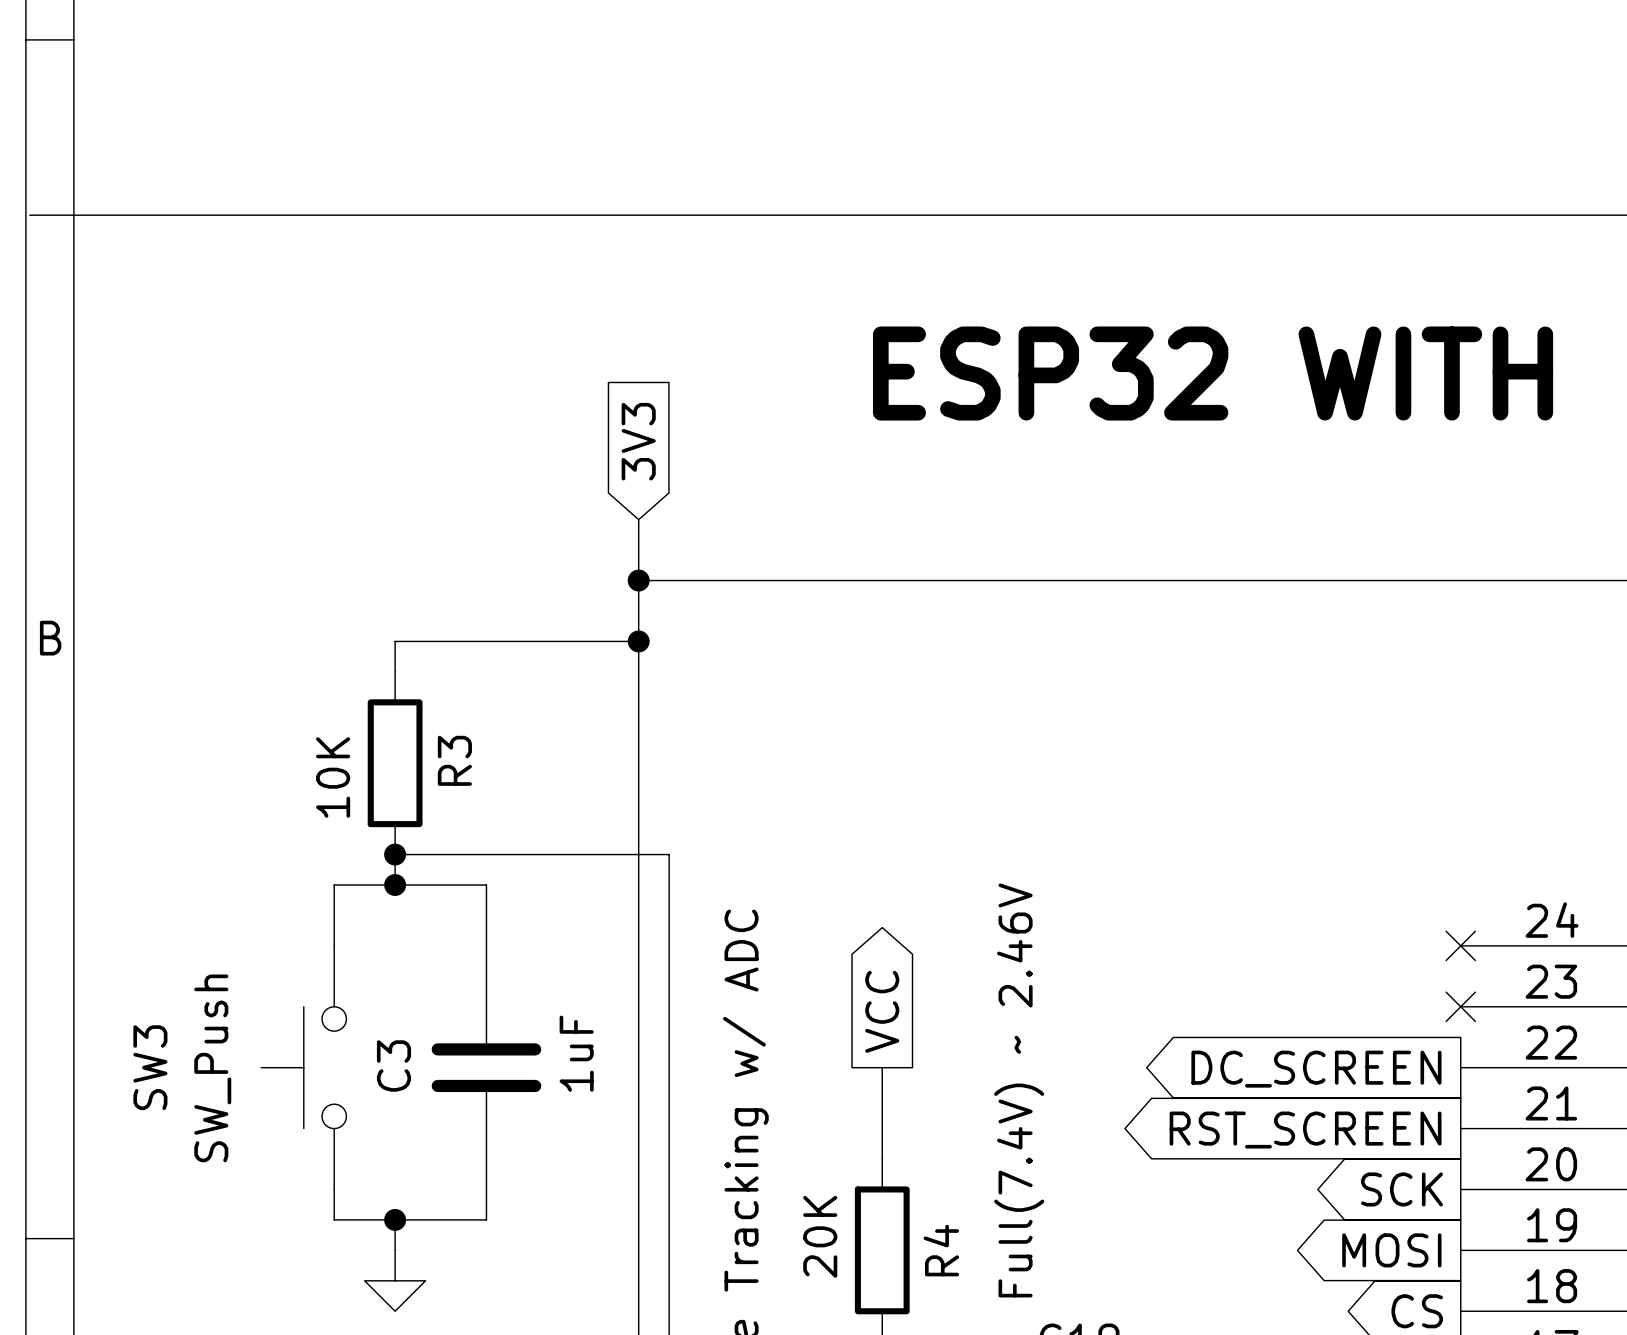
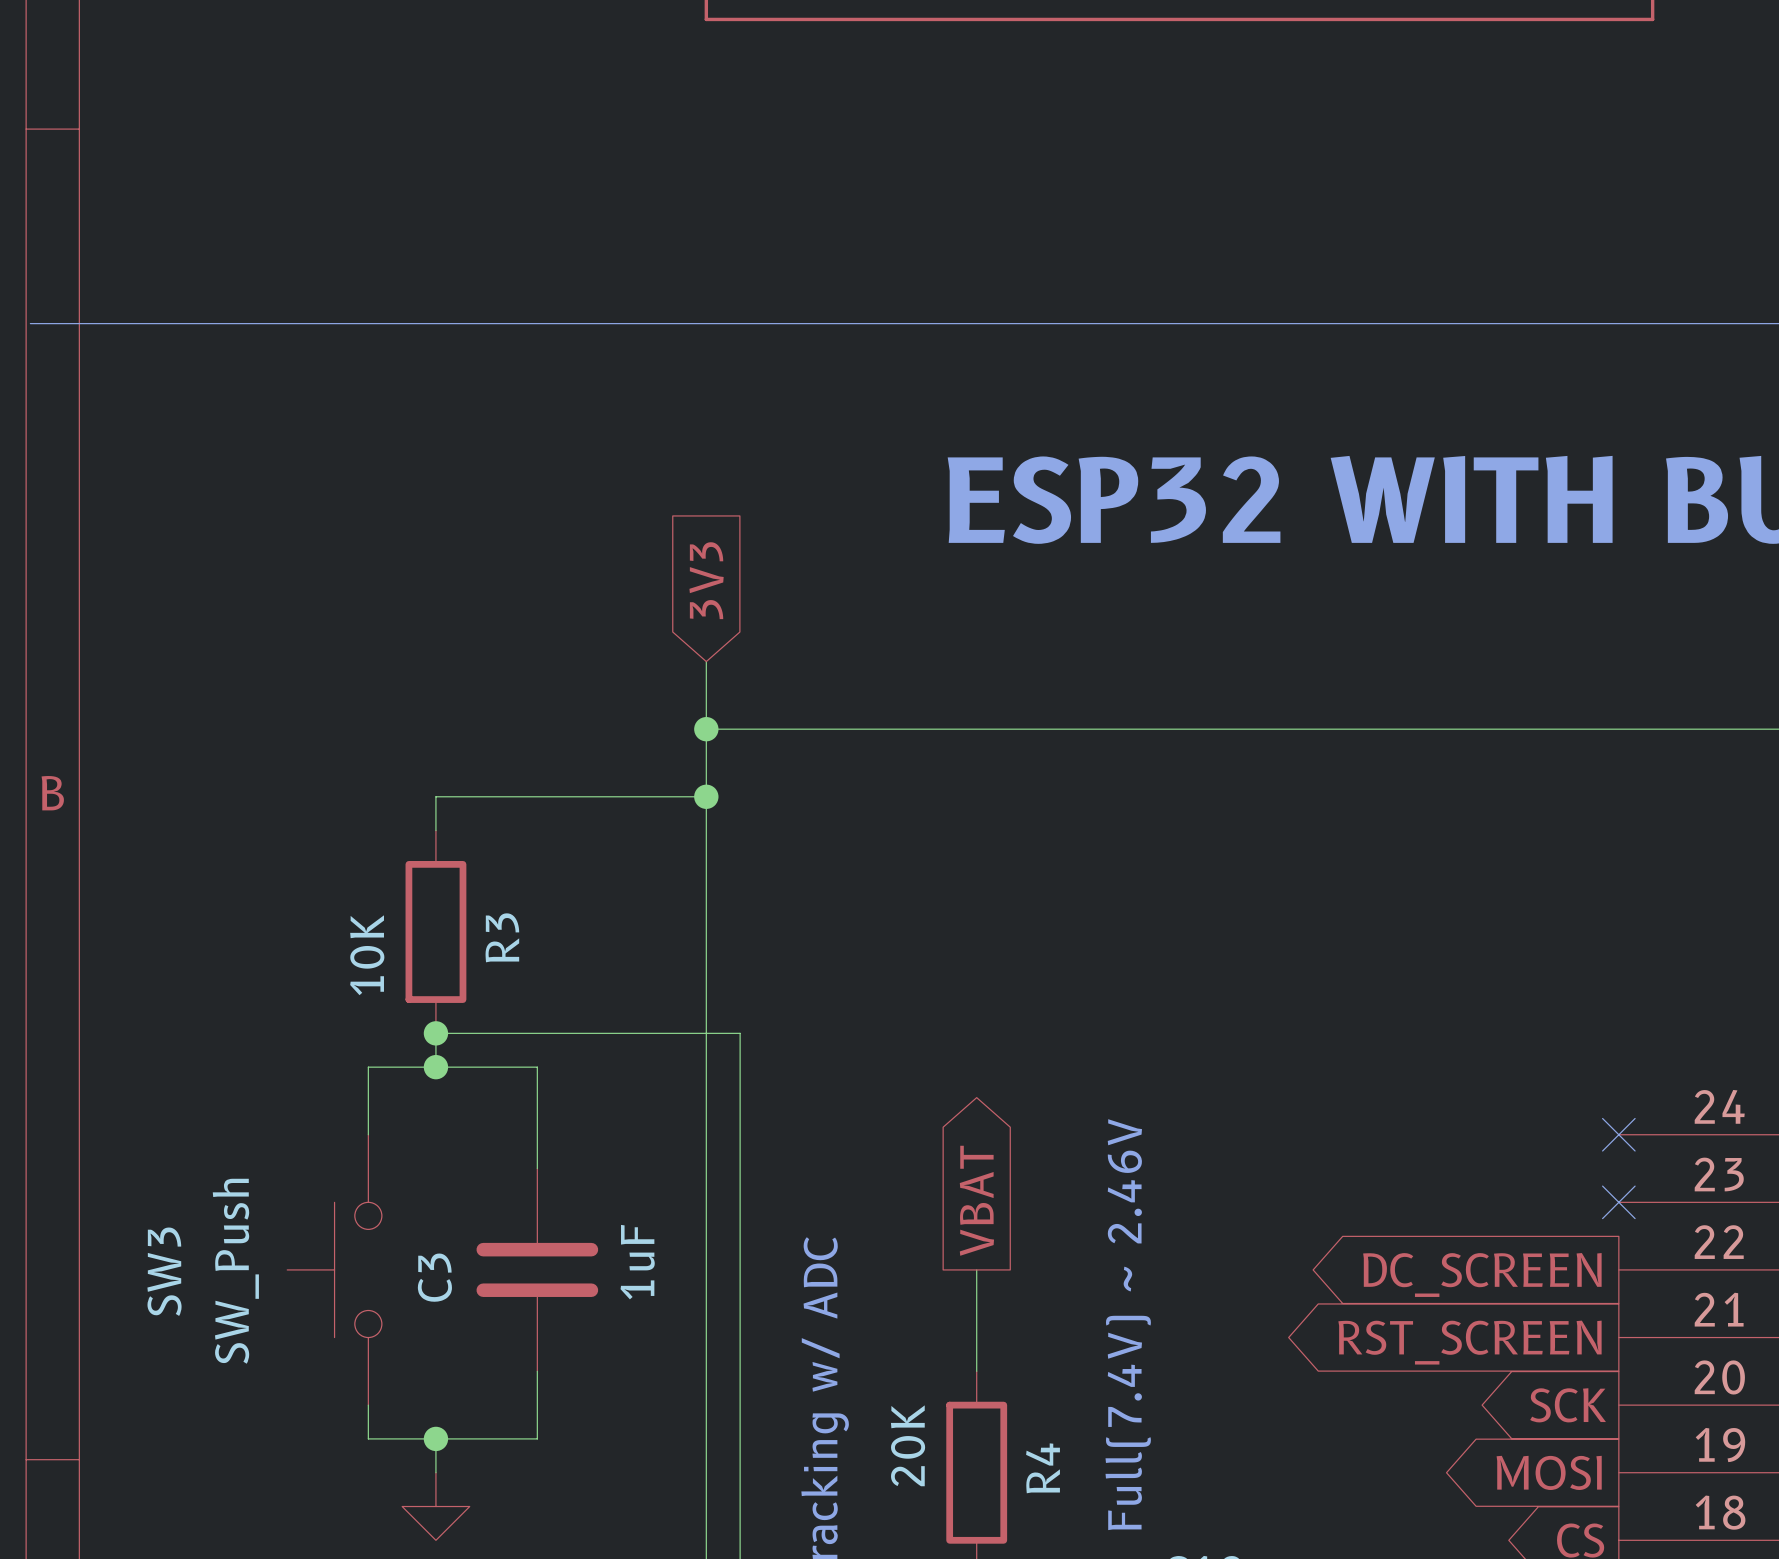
global label: VCC (882, 1011) -> VBAT (976, 1200)

